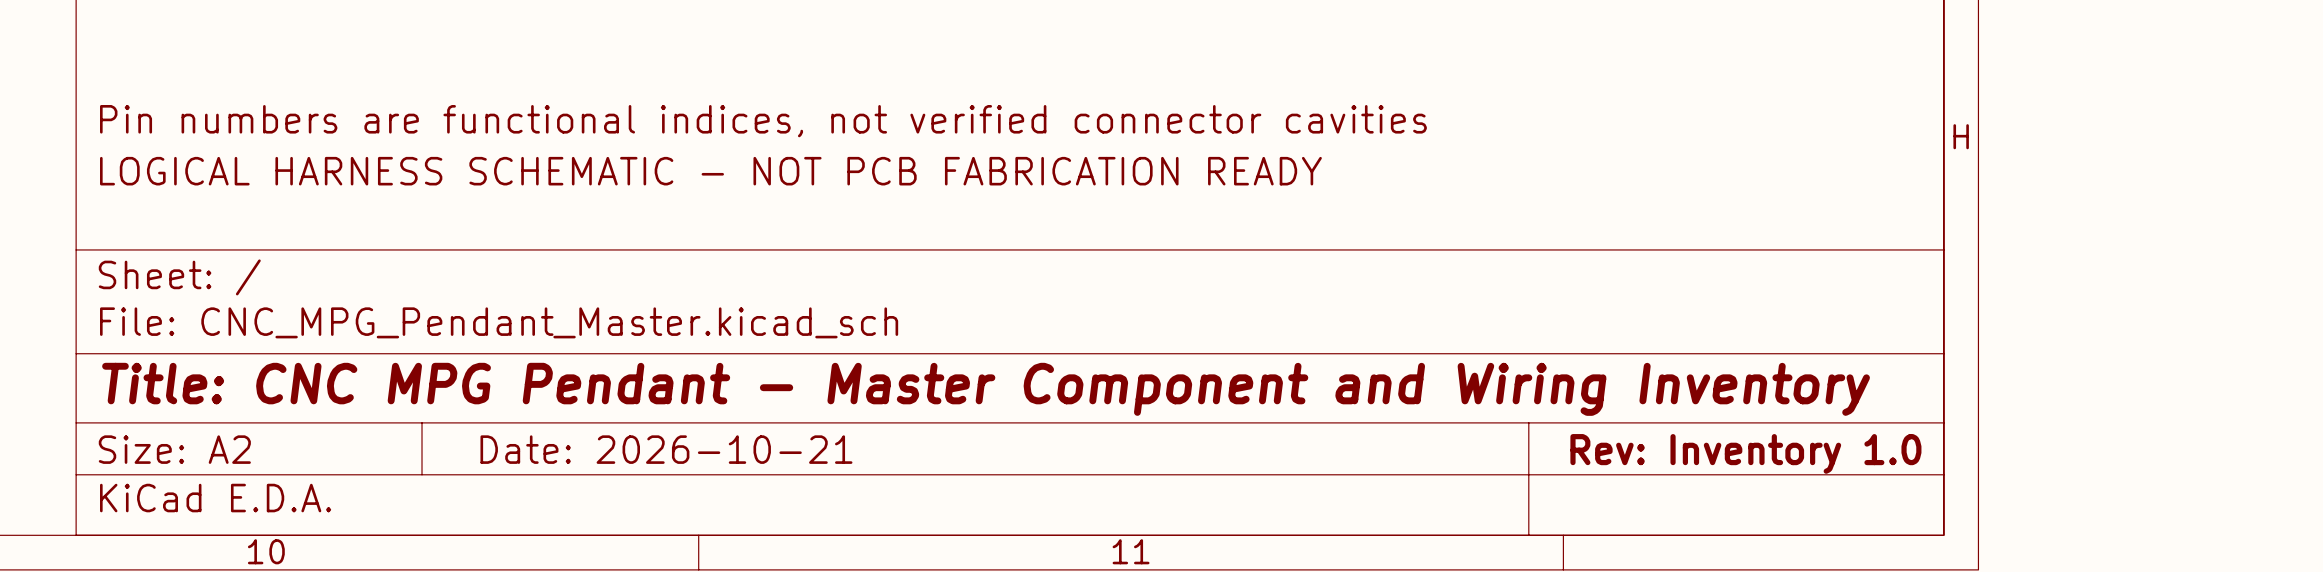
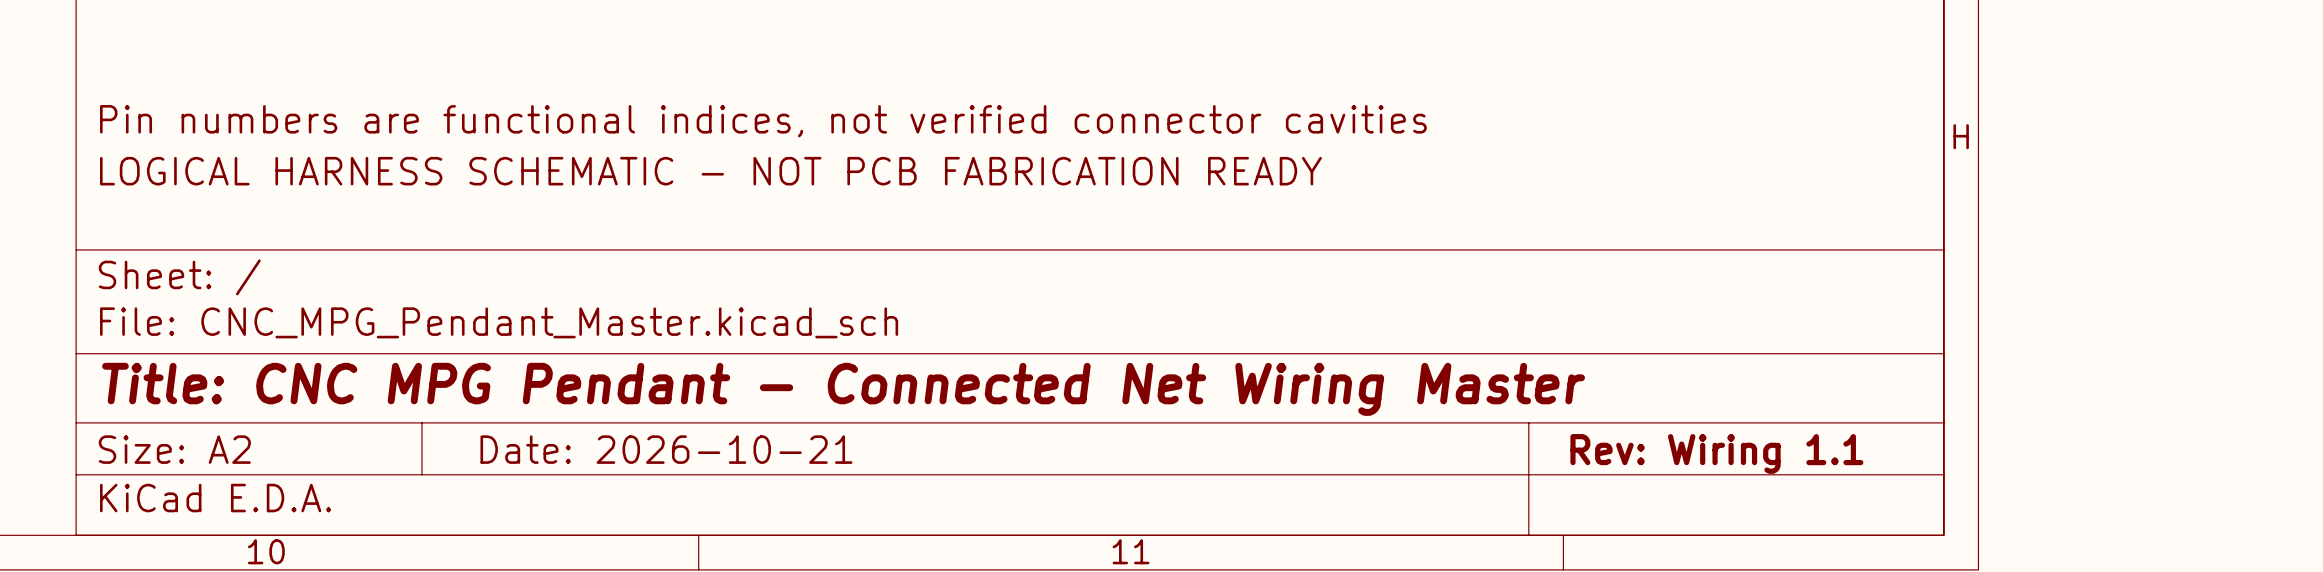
title block: Title: CNC MPG Pendant - Master Component and Wiring Inventory (986, 389) -> Title: CNC MPG Pendant - Connected Net Wiring Master (843, 389)
title block: Rev: Inventory 1.0 (1745, 453) -> Rev: Wiring 1.1 (1716, 453)

